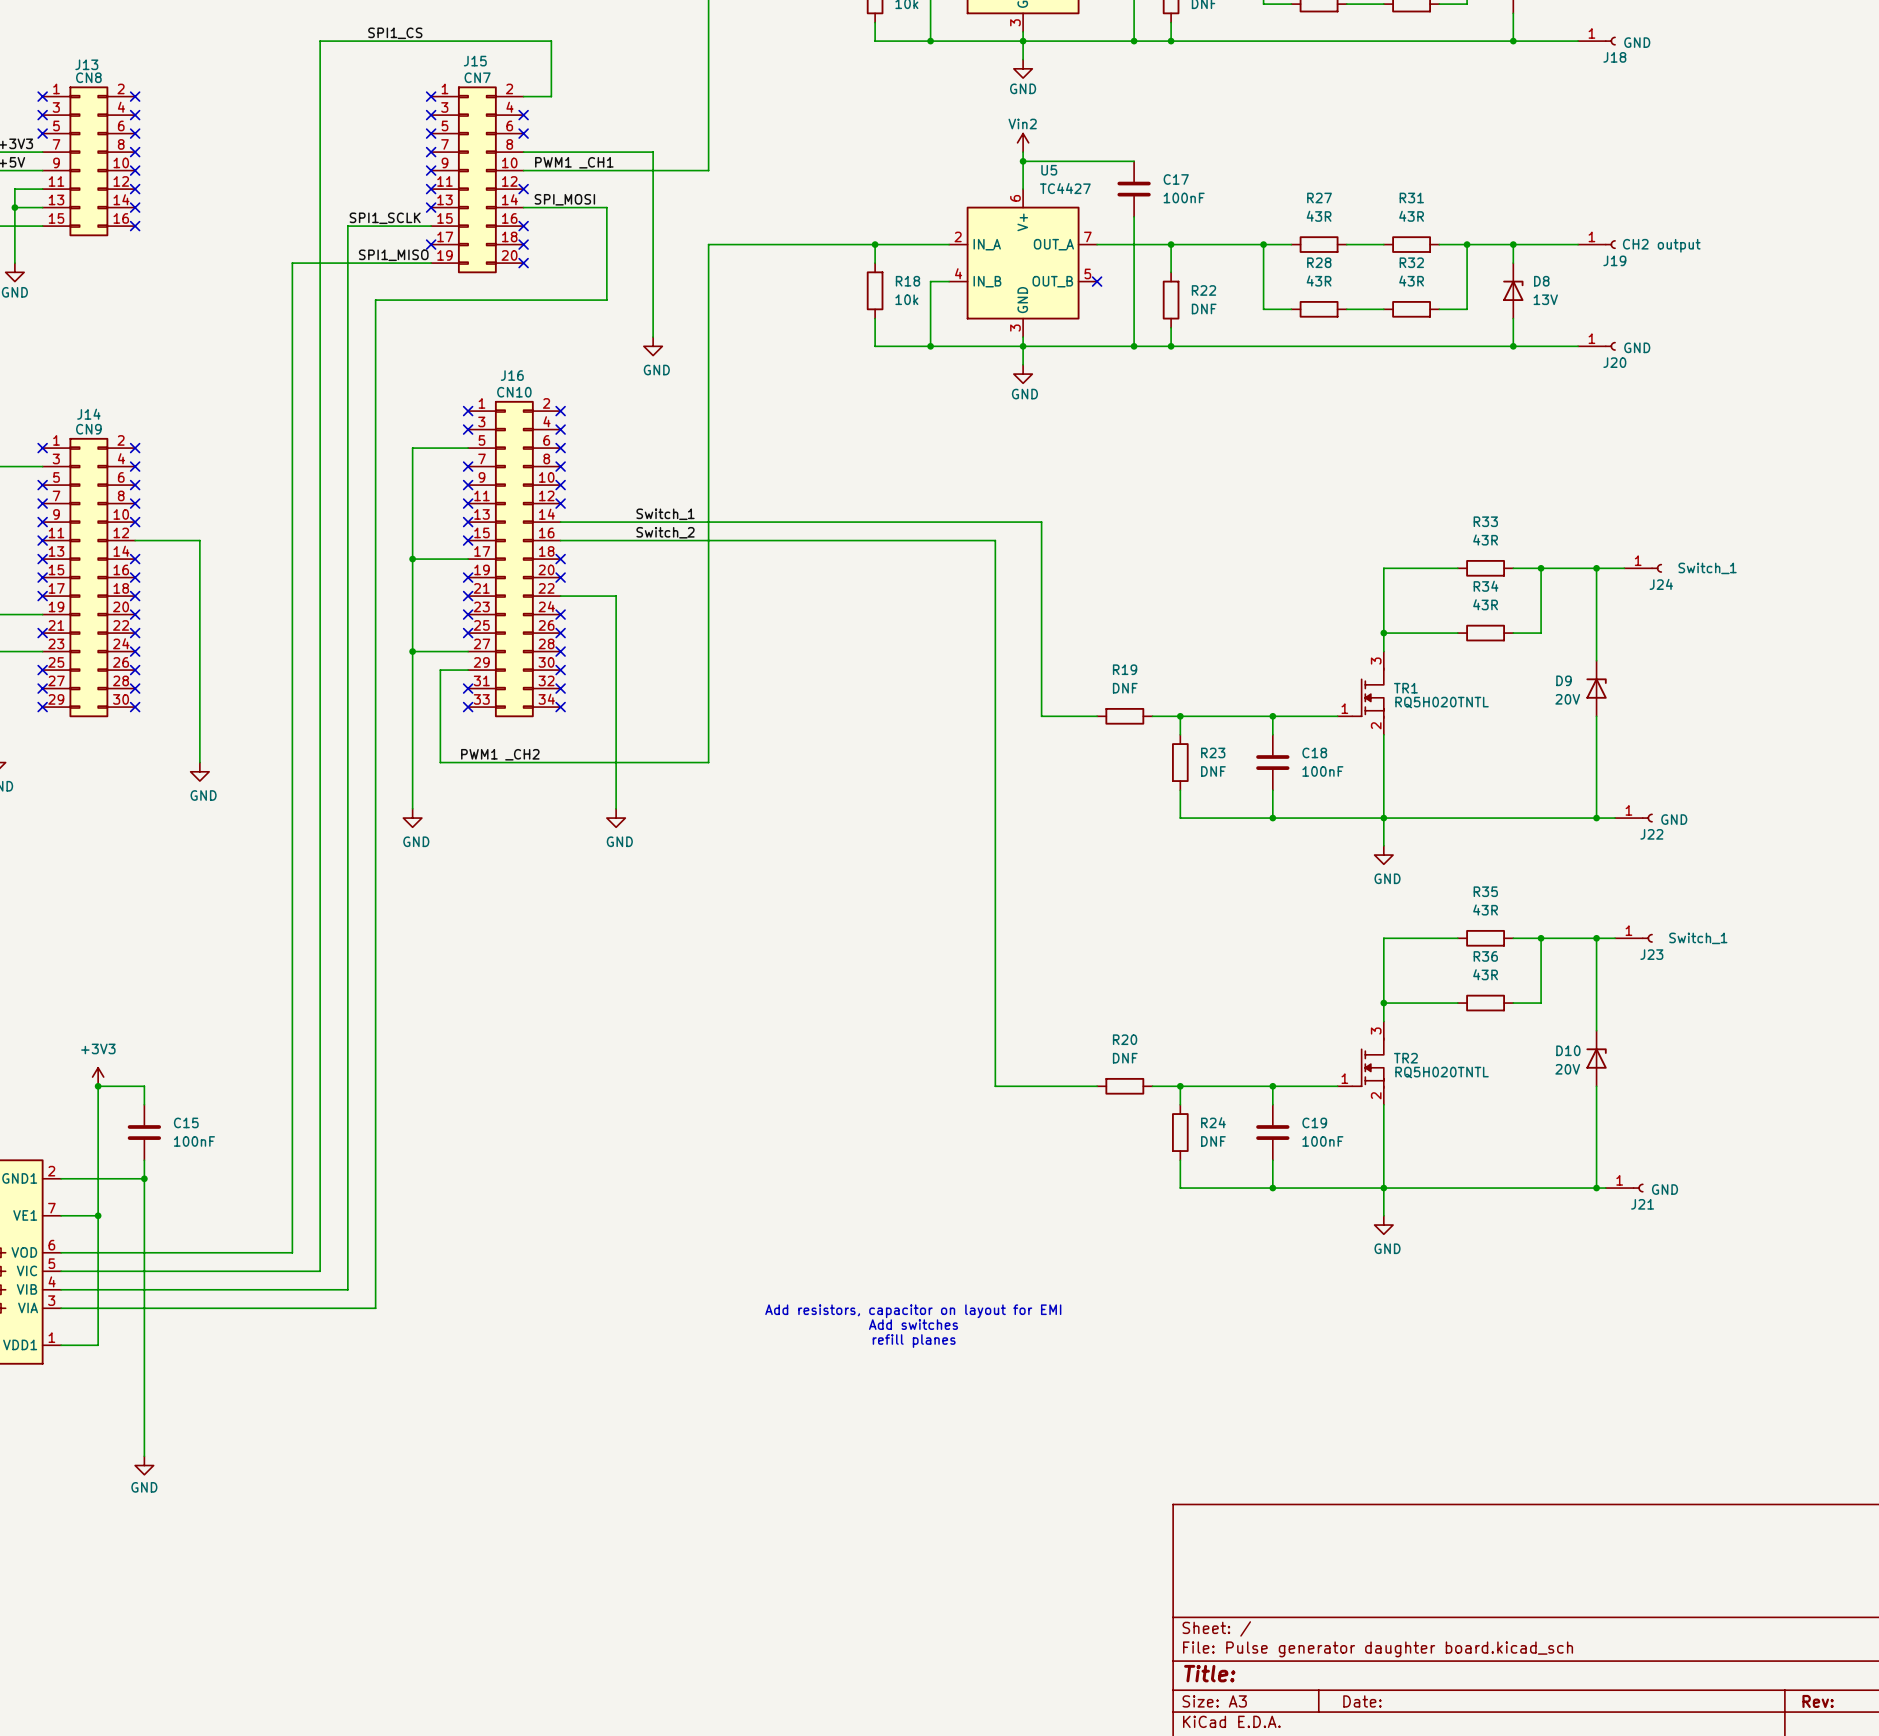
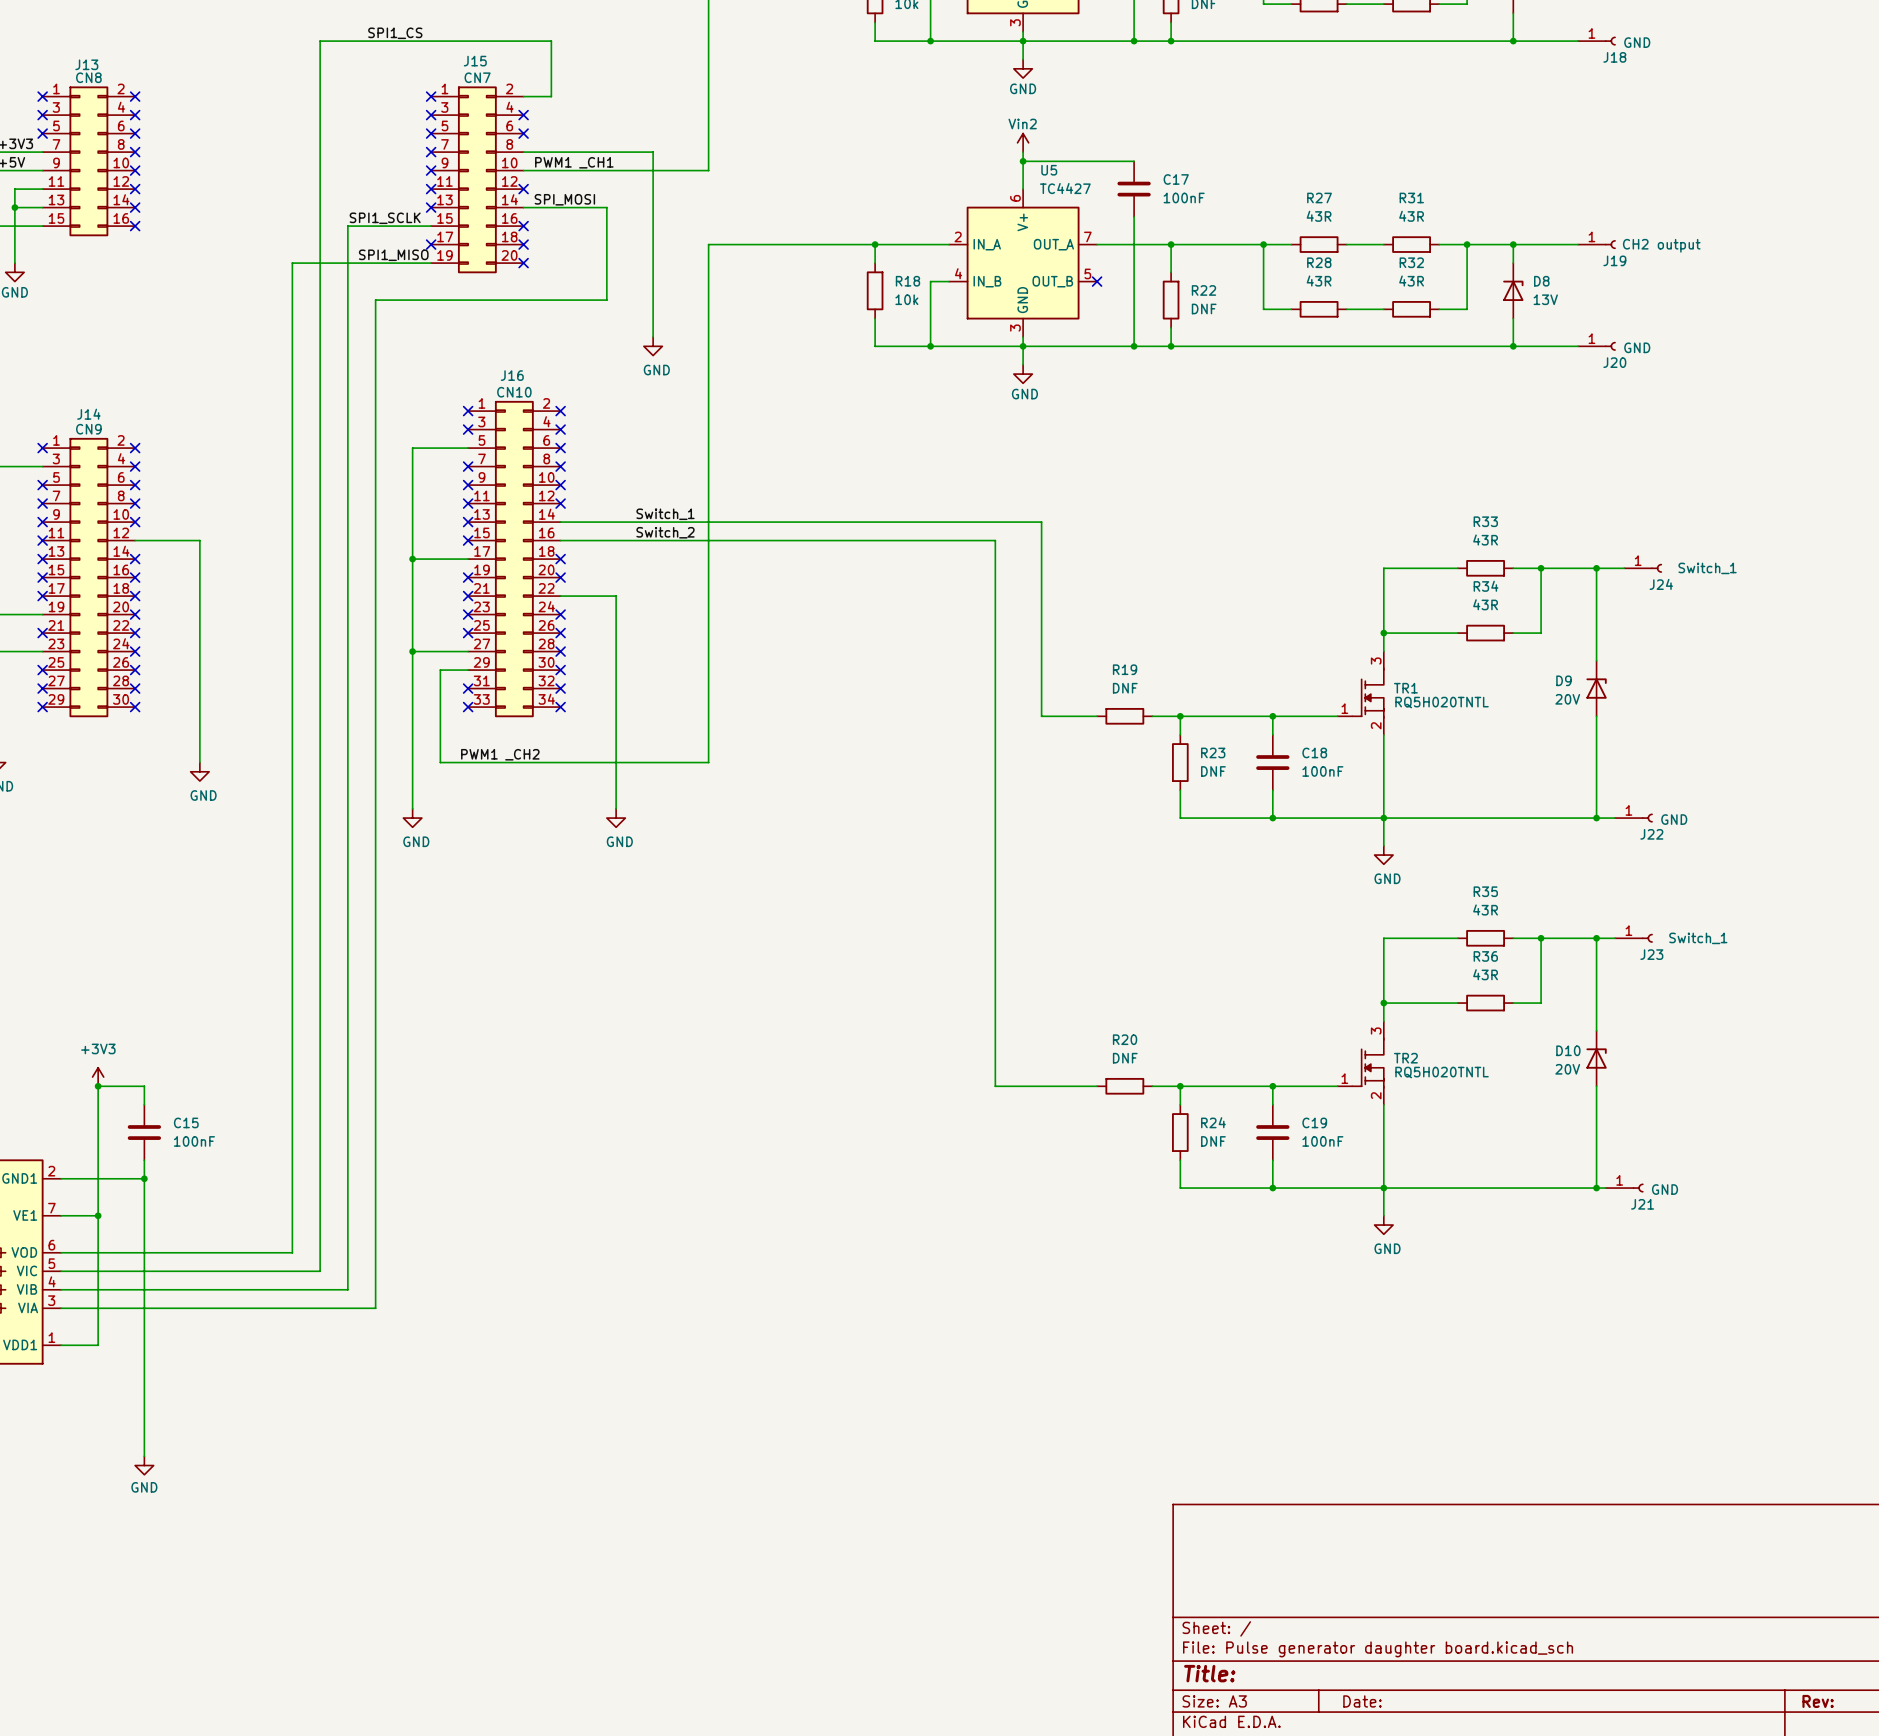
text: Add resistors, capacitor on layout for EMI (913, 1311) -> none
text: Add switches (913, 1324) -> none
text: refill planes (914, 1341) -> none

